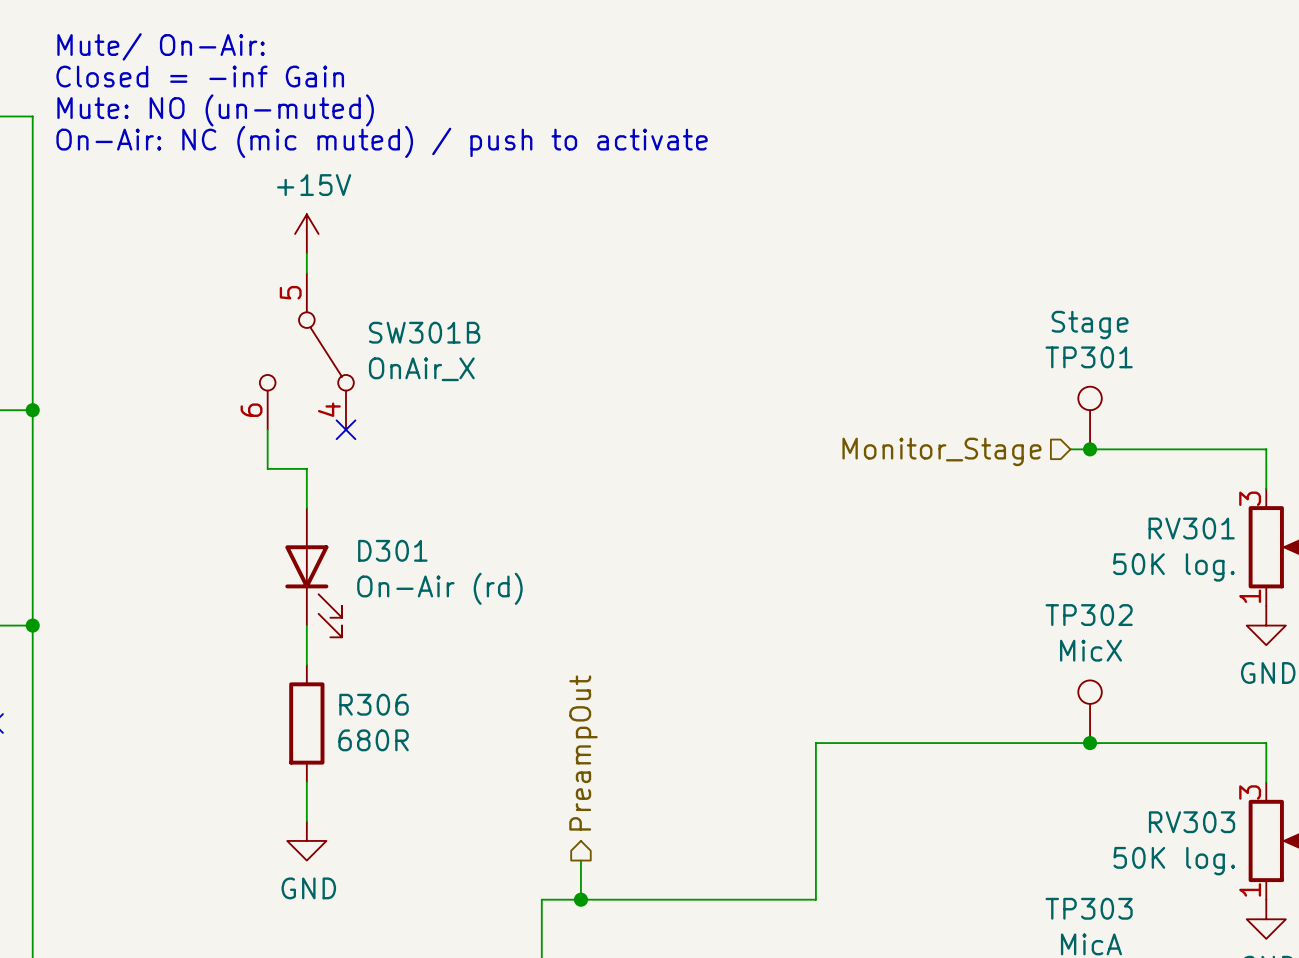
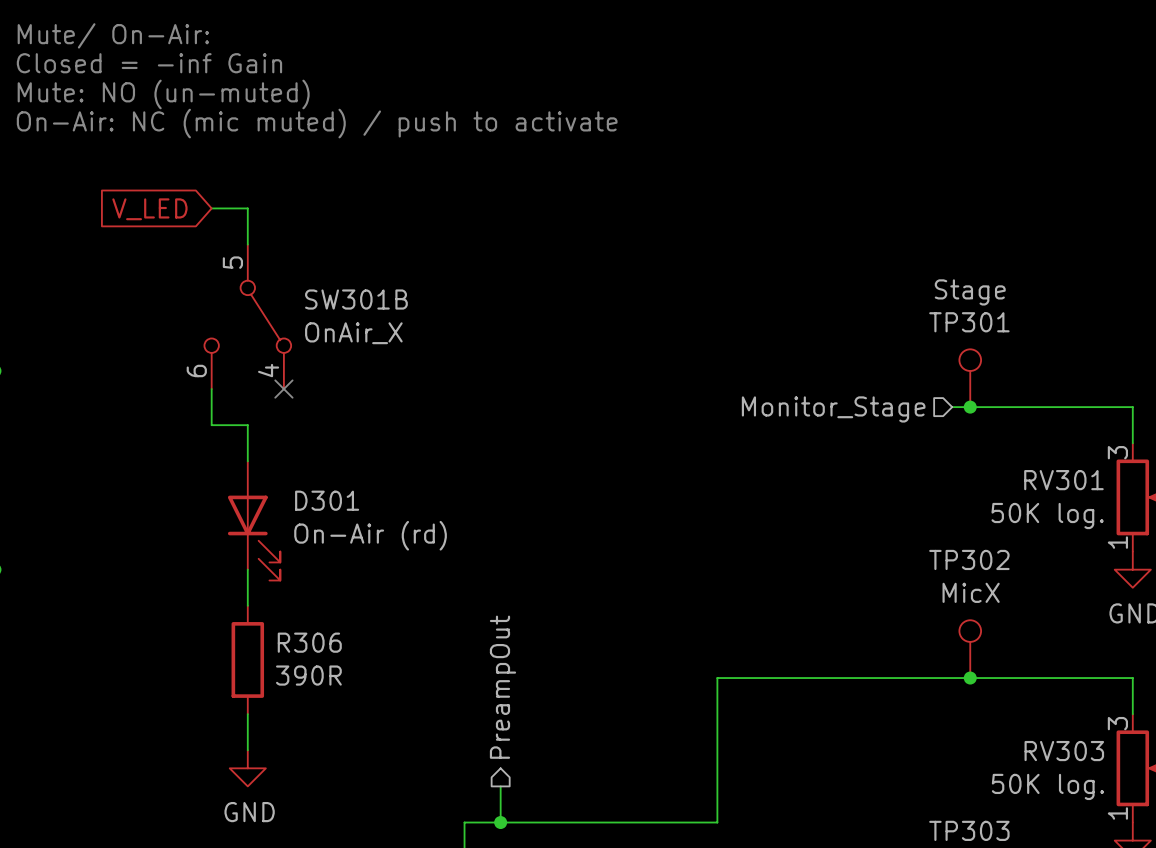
wire: none -> (211, 208) (247, 208) (247, 226)
power symbol: +15V (306, 233) -> none
global label: none -> V_LED (149, 209)
R306 value: 680R (373, 740) -> 390R (308, 675)

